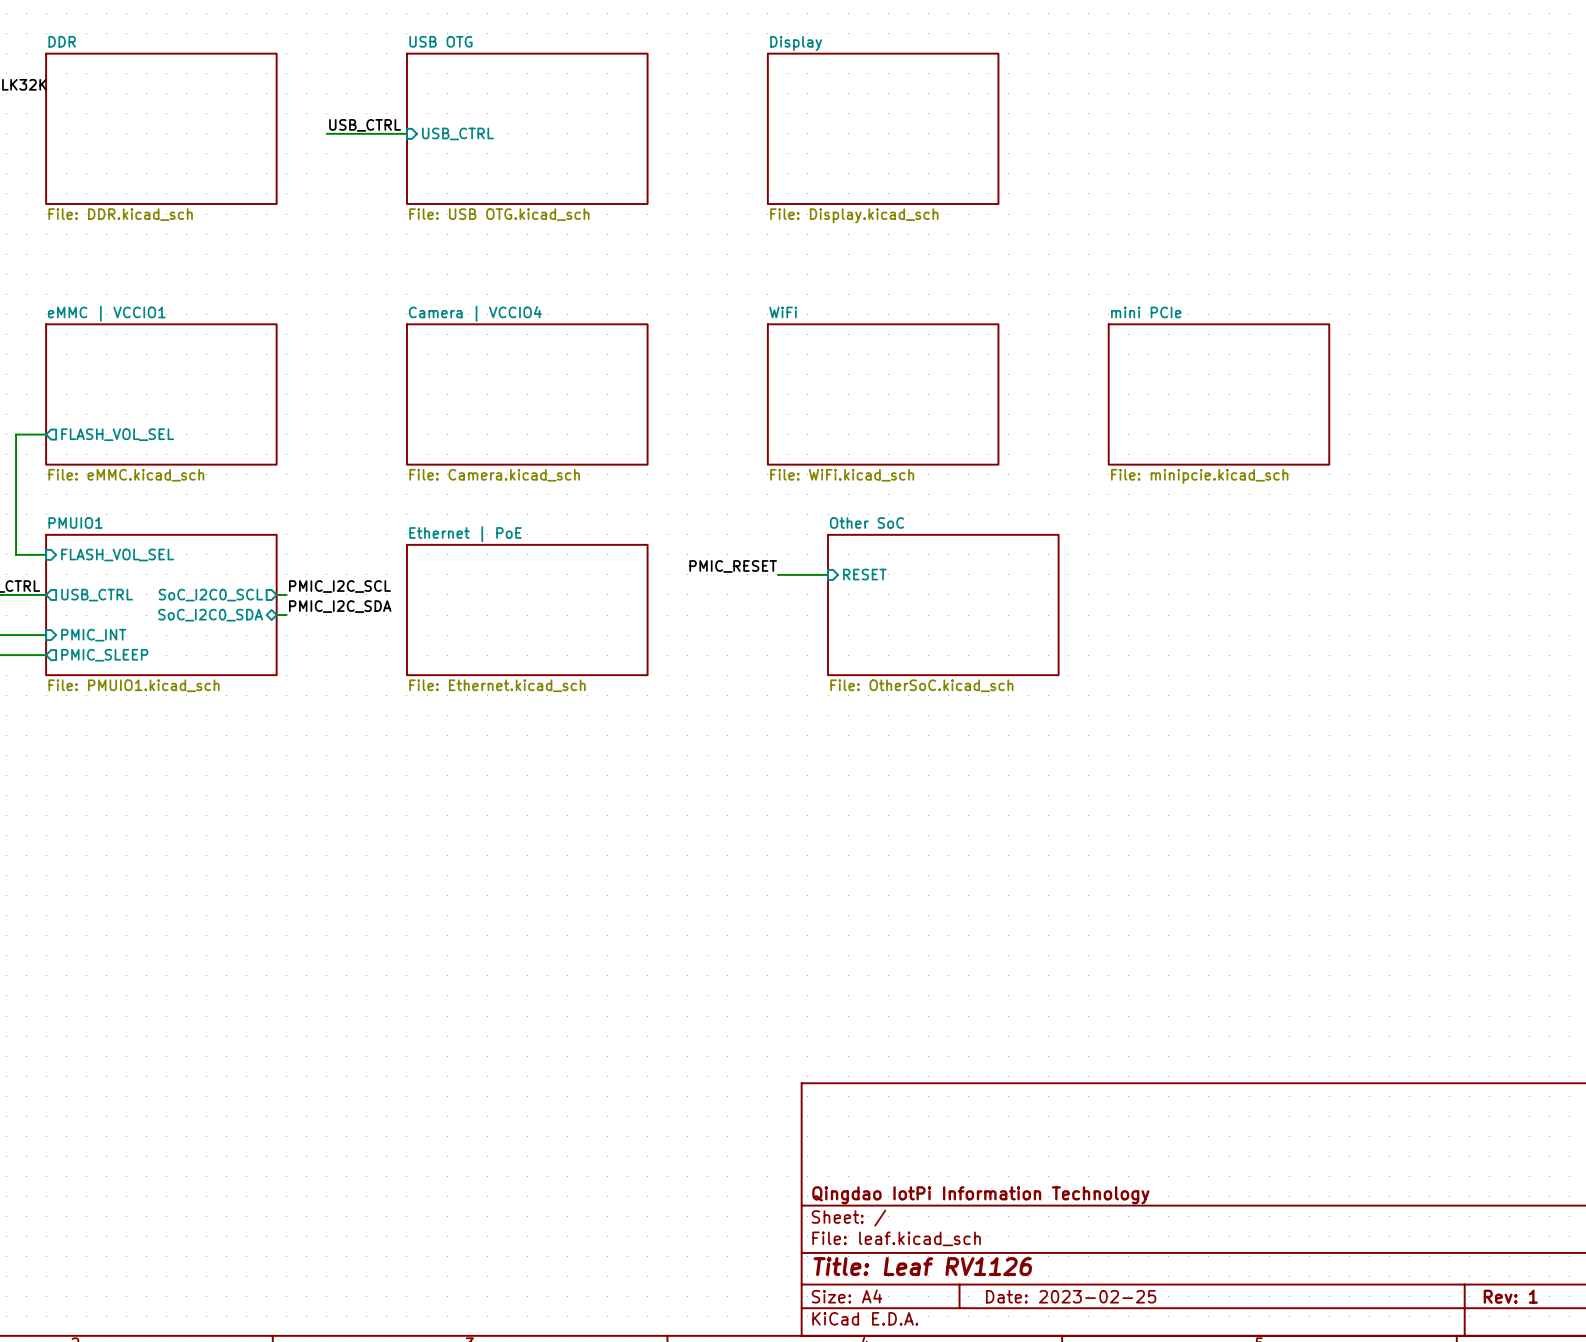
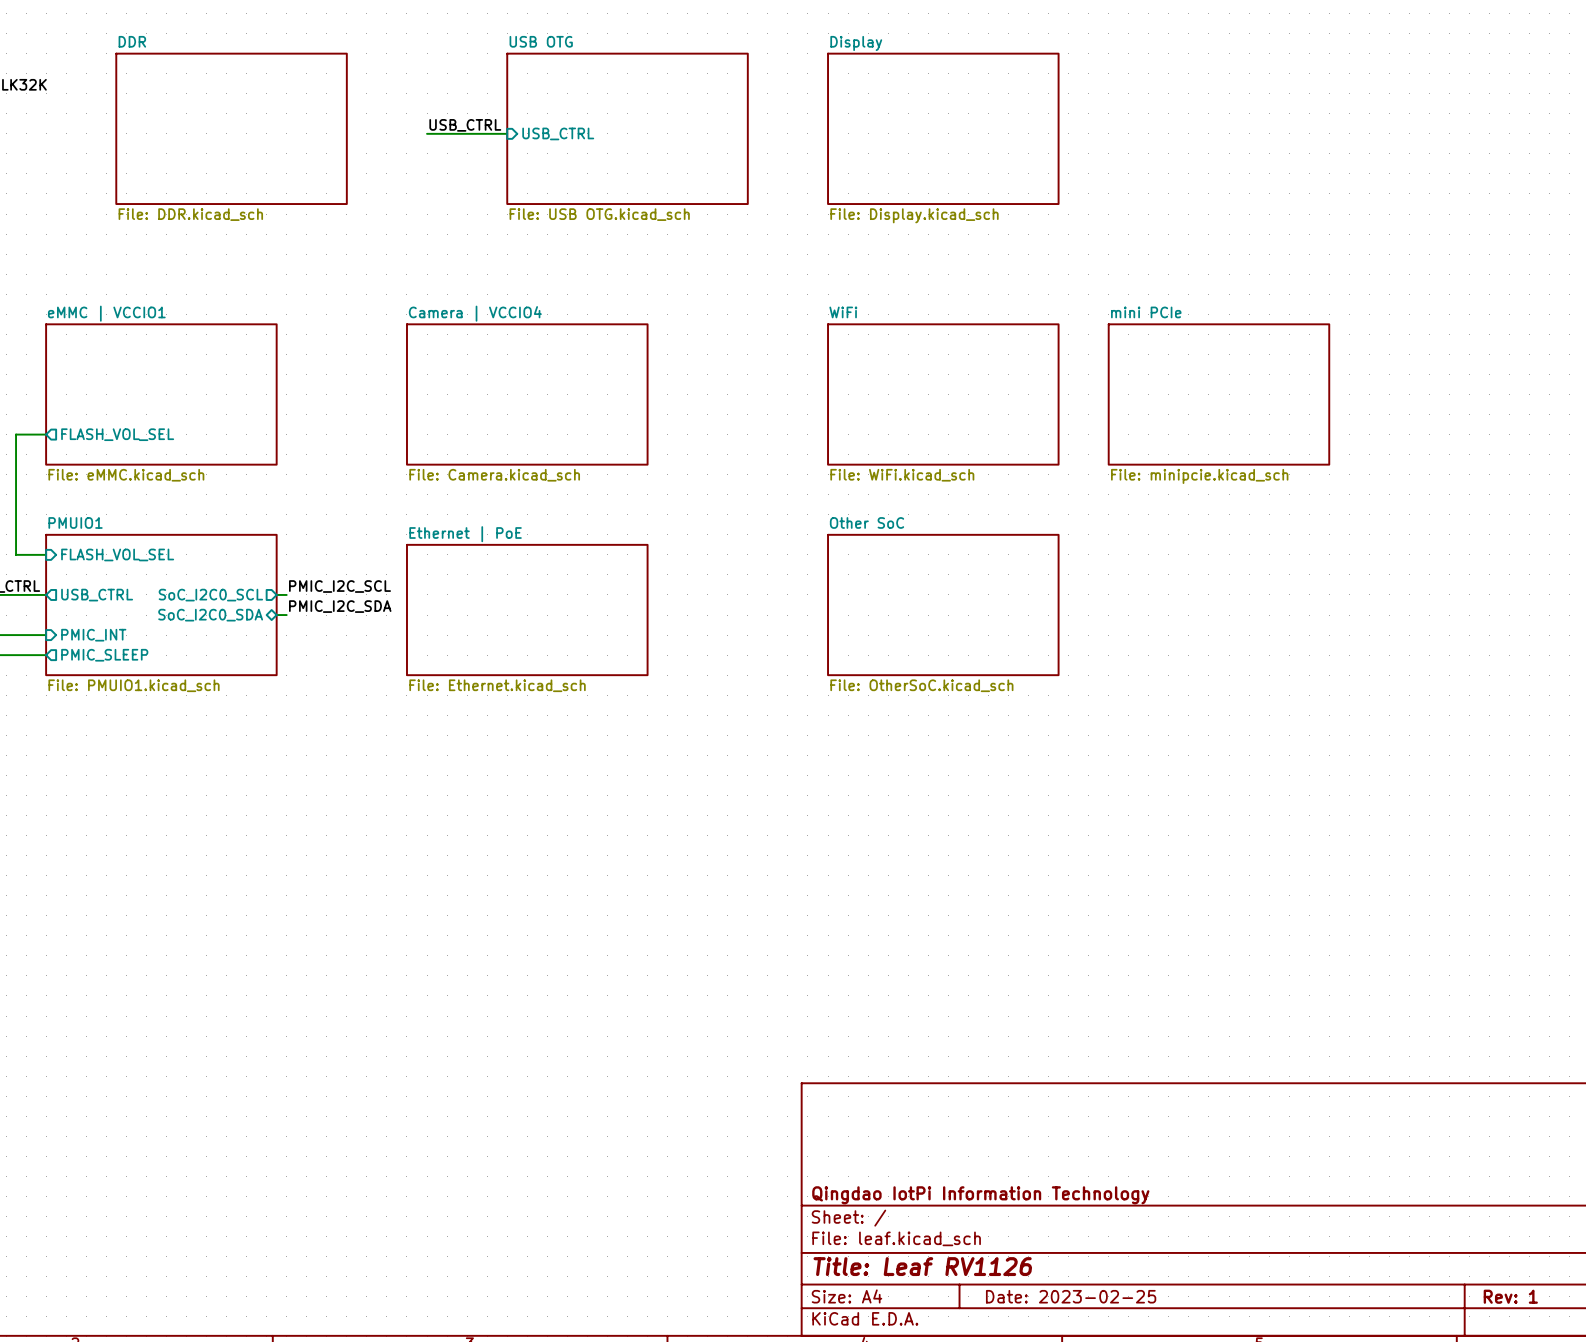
label position: USB_CTRL (365, 125) -> USB_CTRL (465, 125)
sheet DDR position: (161, 128) -> (231, 128)
sheet USB OTG position: (527, 128) -> (627, 128)
sheet Display position: (883, 128) -> (943, 128)
wire: (326, 133) (406, 133) -> (427, 133) (507, 133)
sheet pin position: USB_CTRL (457, 133) -> USB_CTRL (558, 133)
sheet WiFi position: (883, 394) -> (943, 394)
label: PMIC_RESET (733, 566) -> none
wire: (777, 574) (828, 574) -> none
sheet pin: RESET (864, 574) -> none

